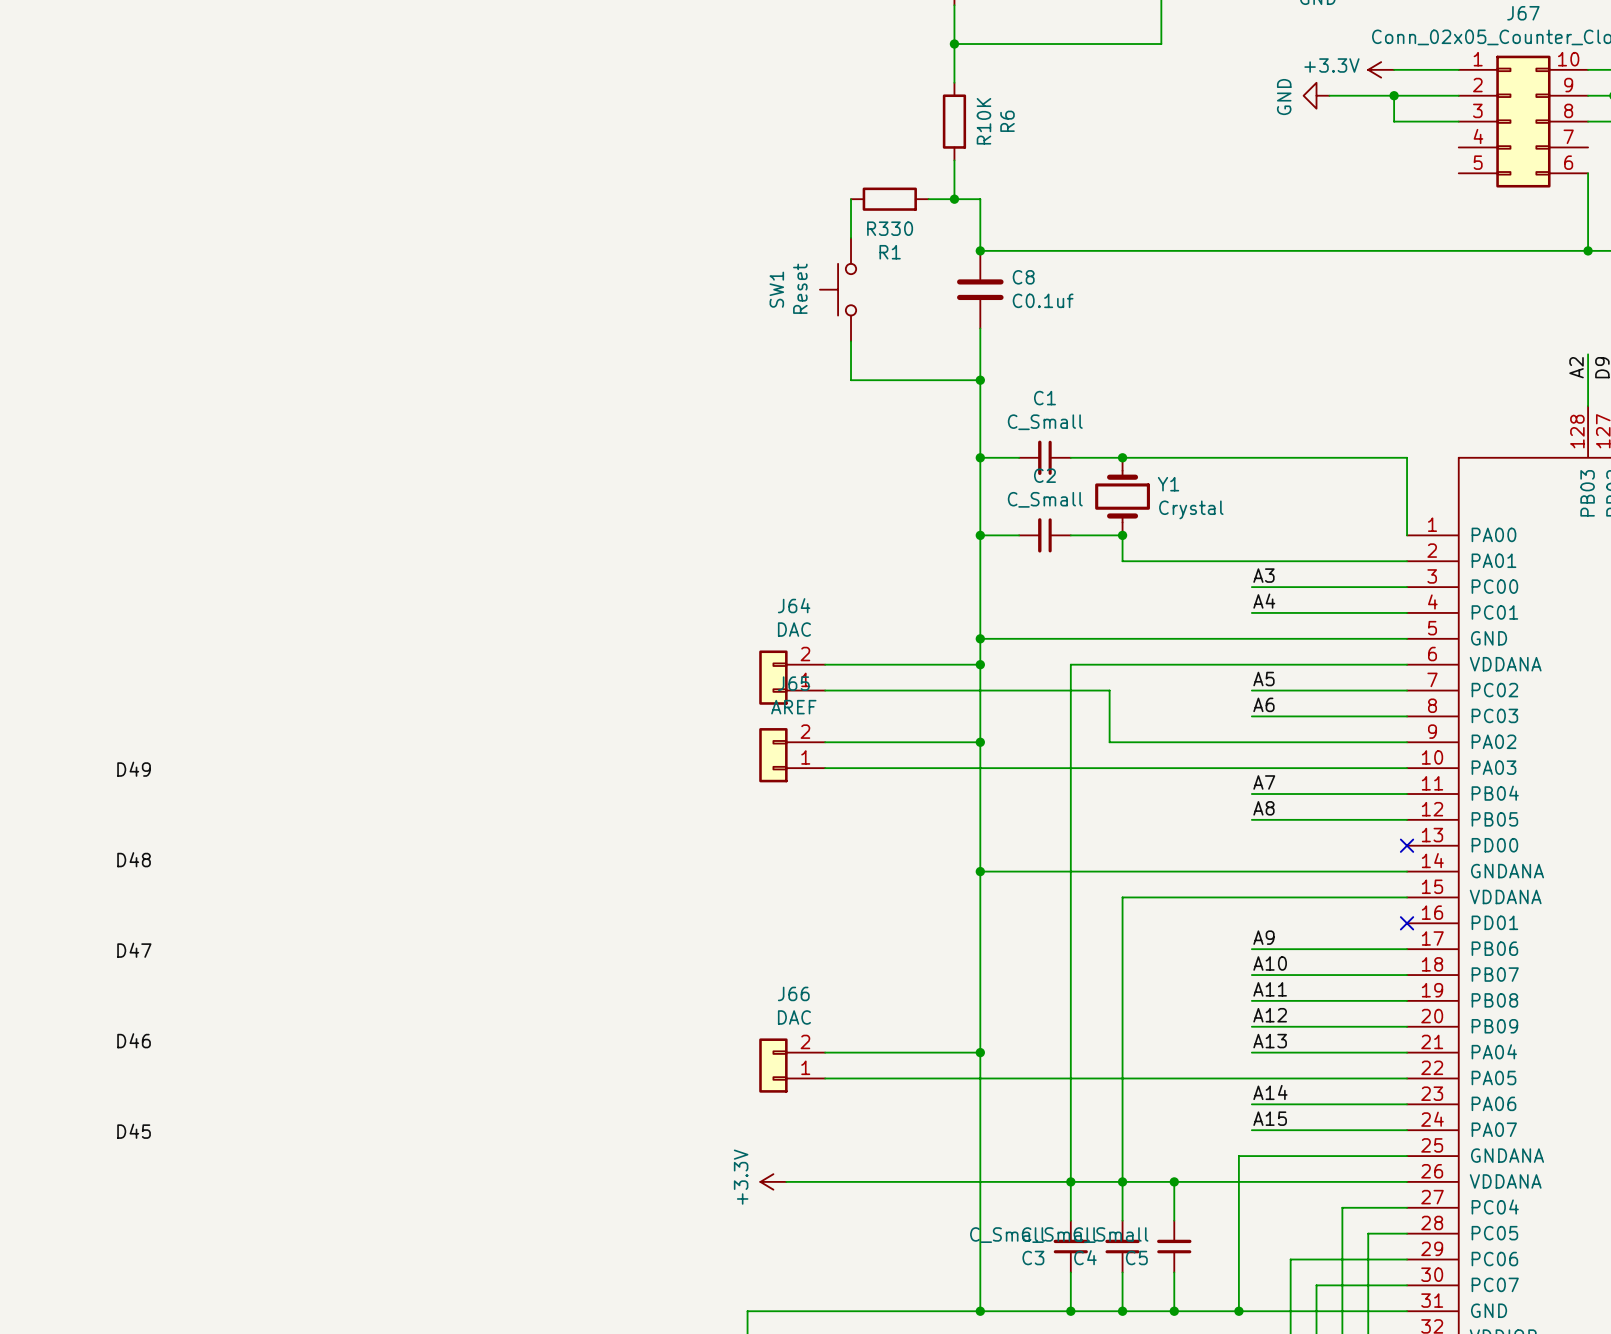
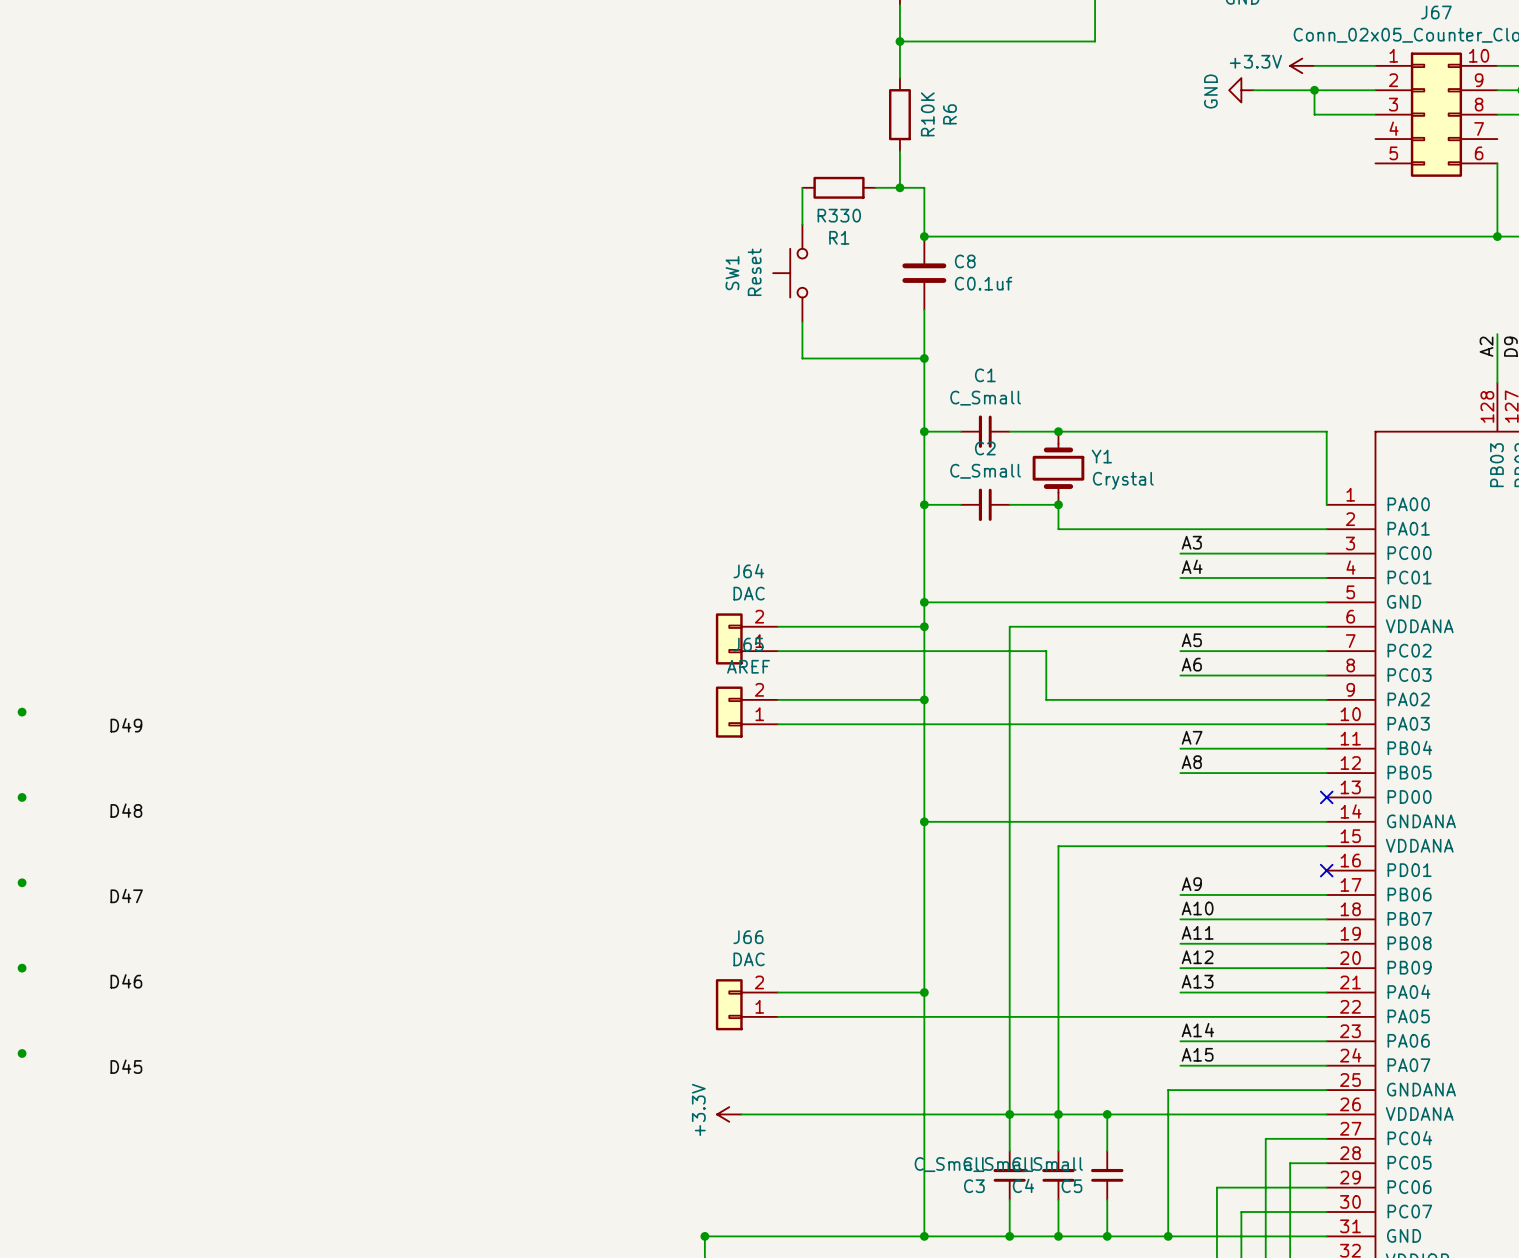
junction: none -> (22, 712)
junction: none -> (22, 797)
junction: none -> (22, 882)
junction: none -> (22, 968)
junction: none -> (22, 1053)
junction: none -> (704, 1236)

